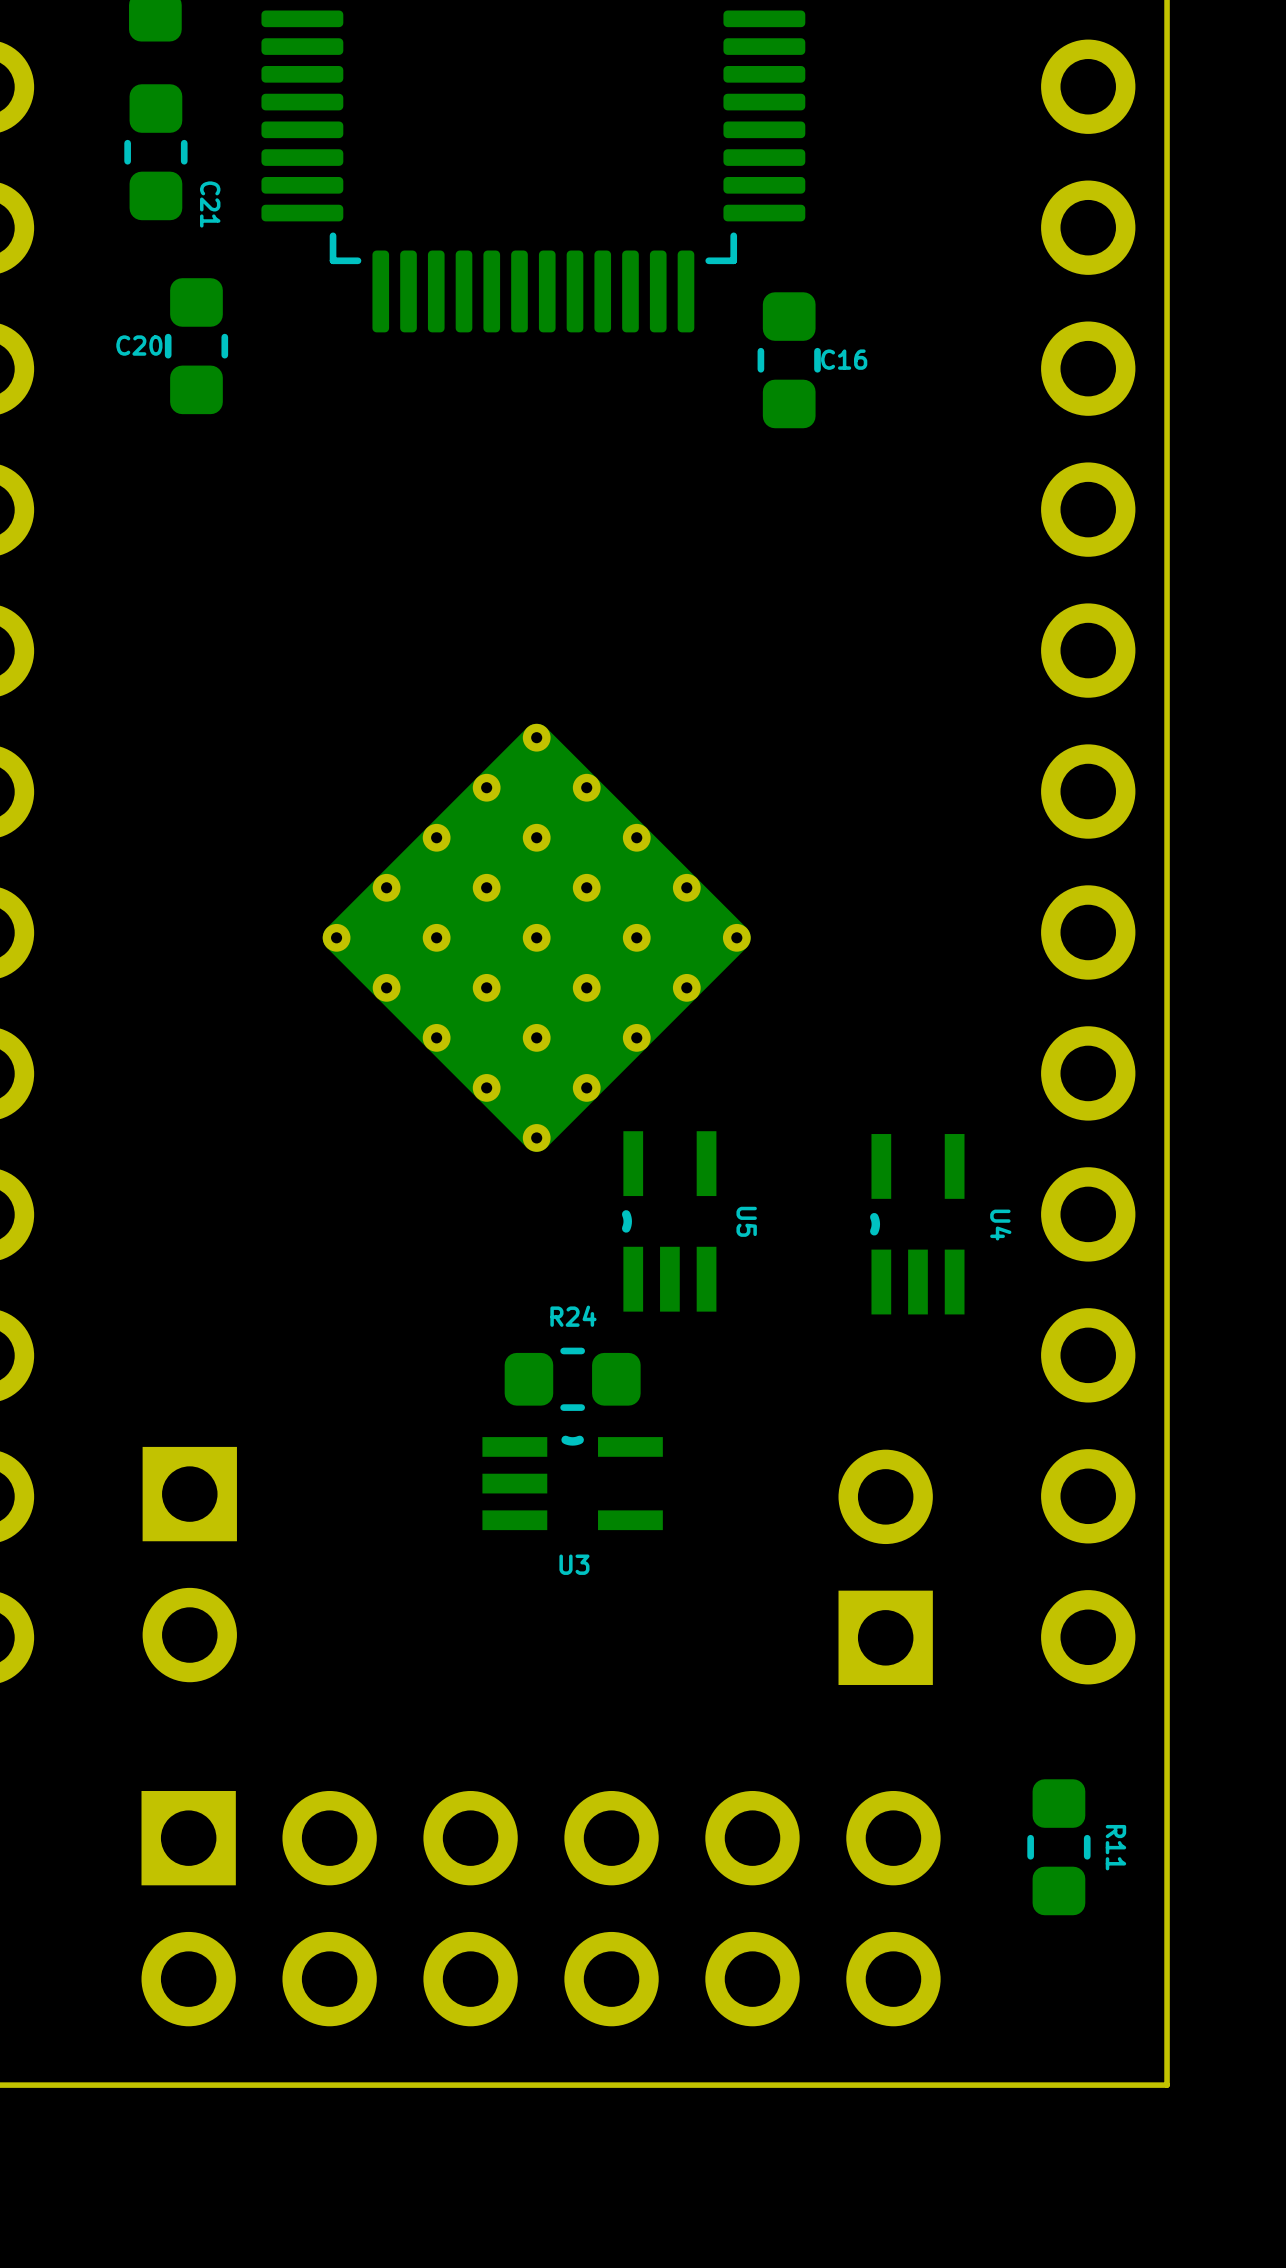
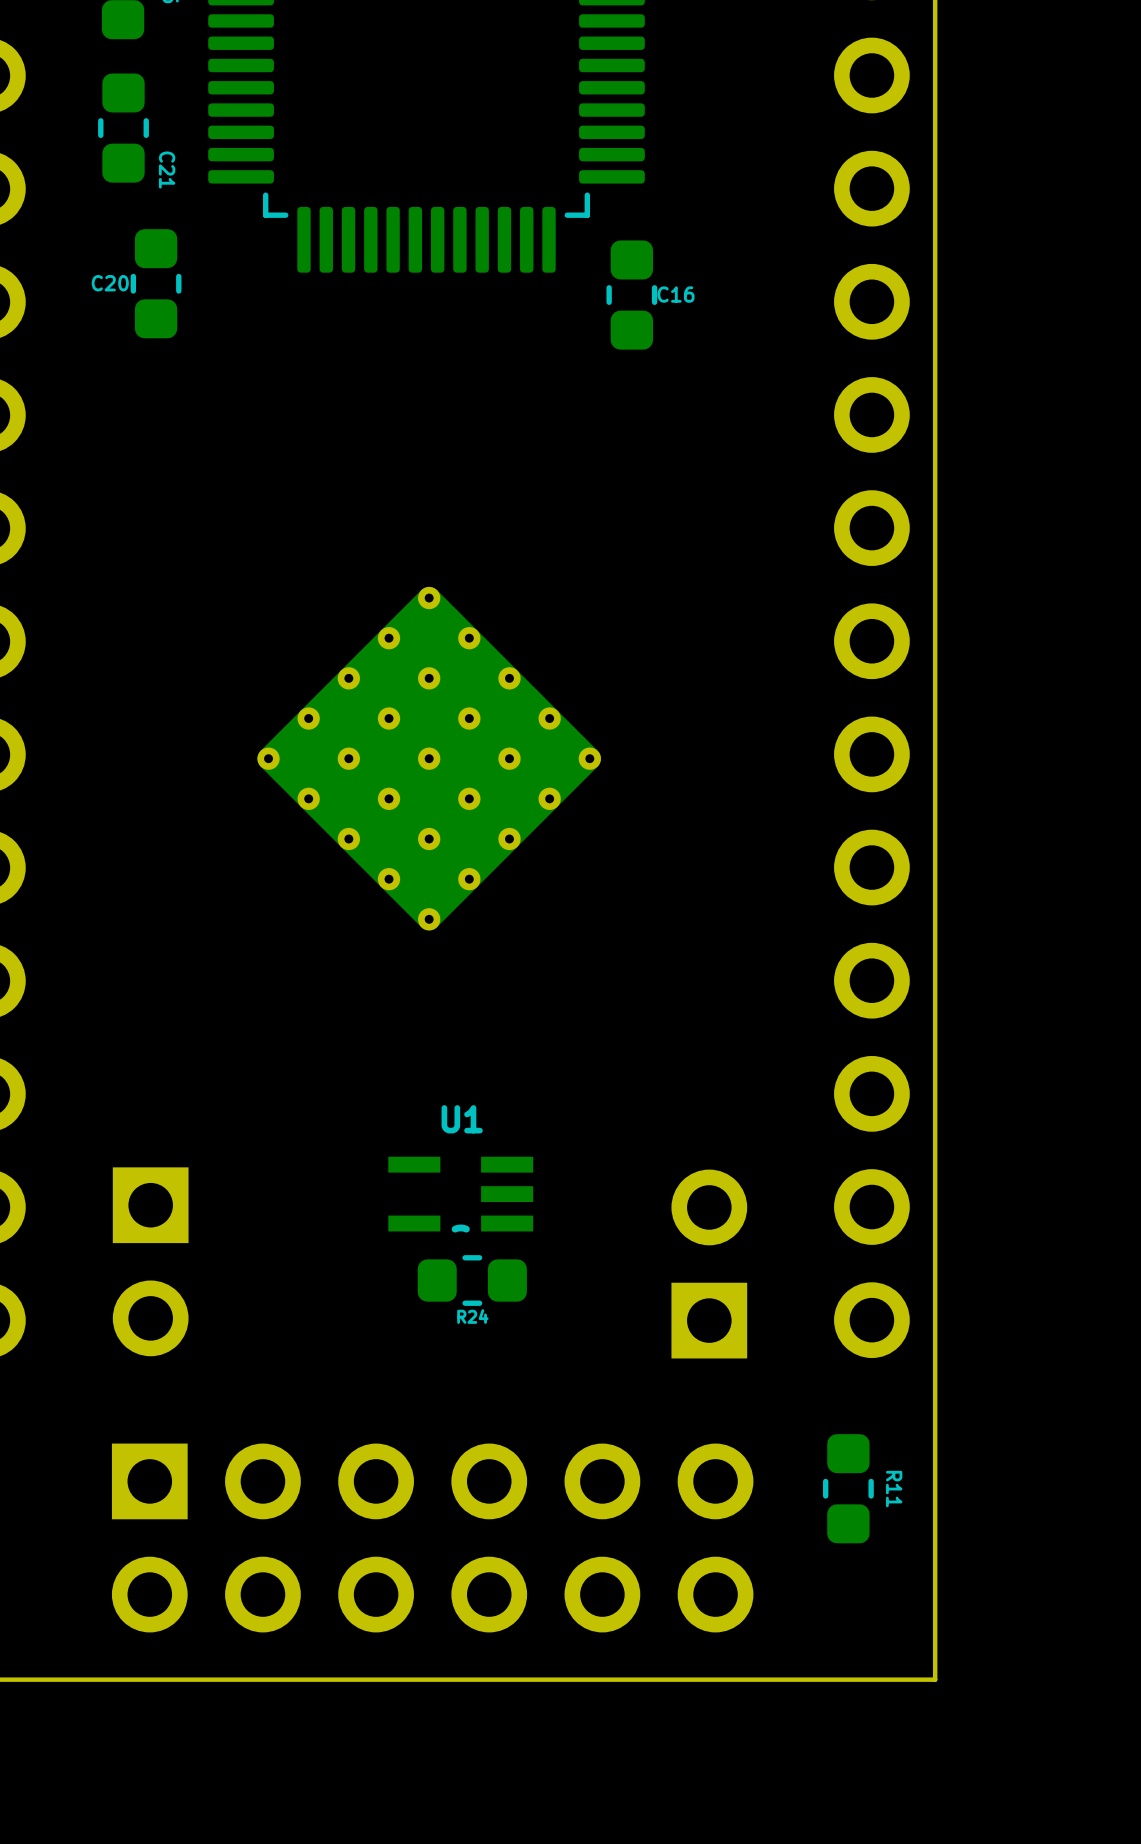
U5: (669, 1221) -> none
U4: (917, 1224) -> none
R24 name position: R24 (573, 1316) -> R24 (472, 1316)
R24 position: (572, 1379) -> (472, 1280)
U1: none -> (460, 1194)
U3: (572, 1482) -> none

